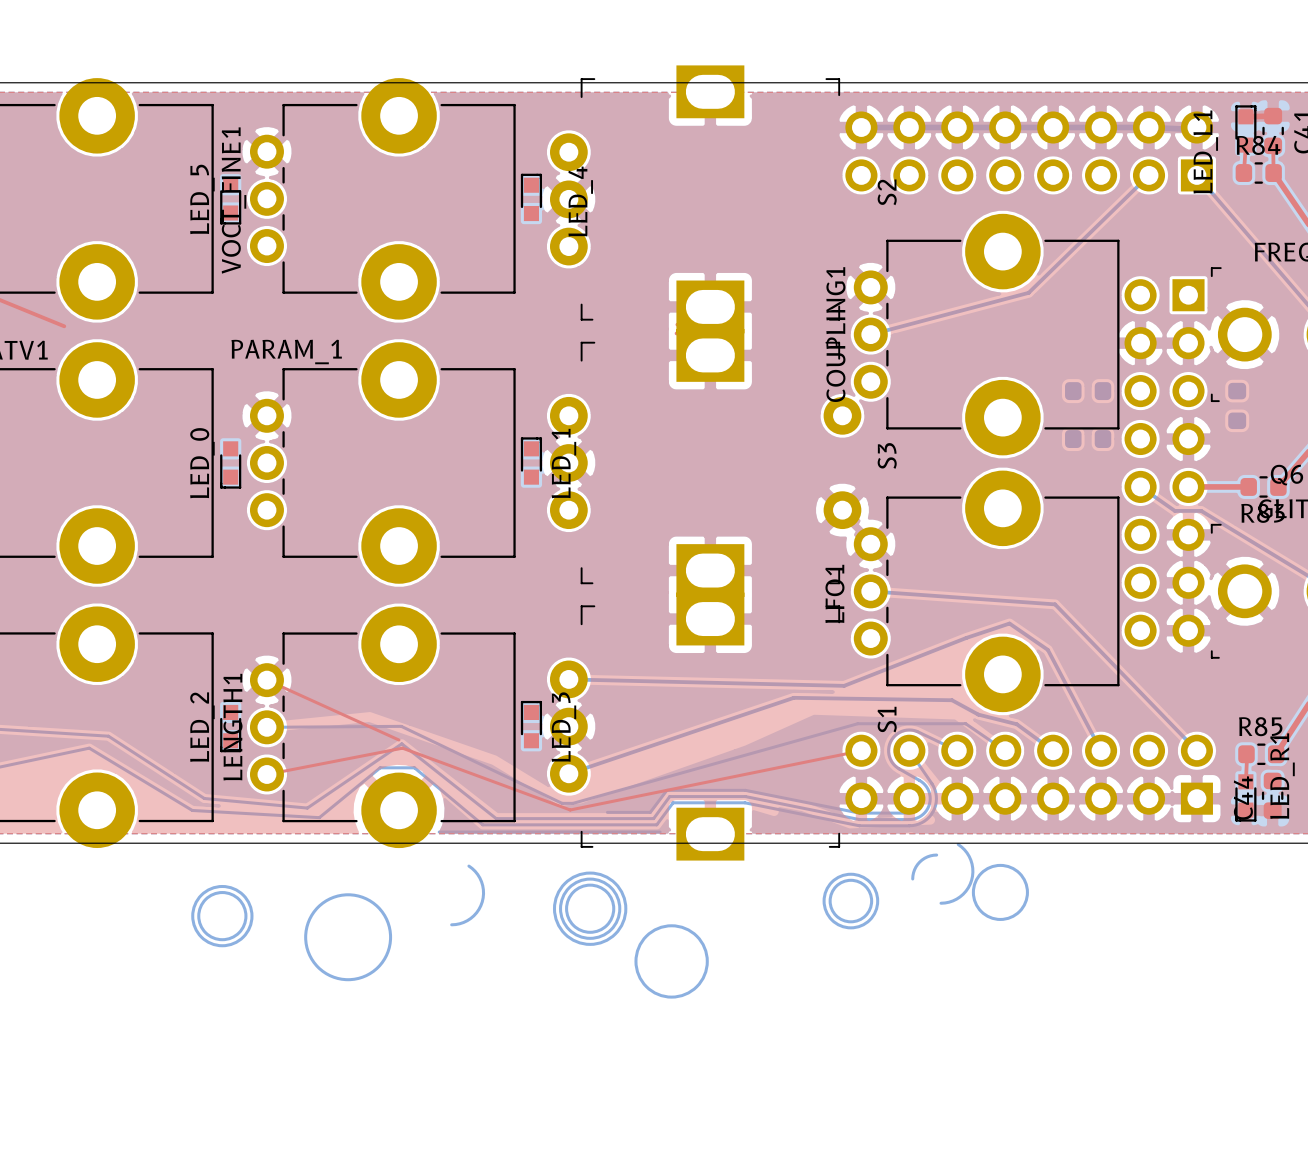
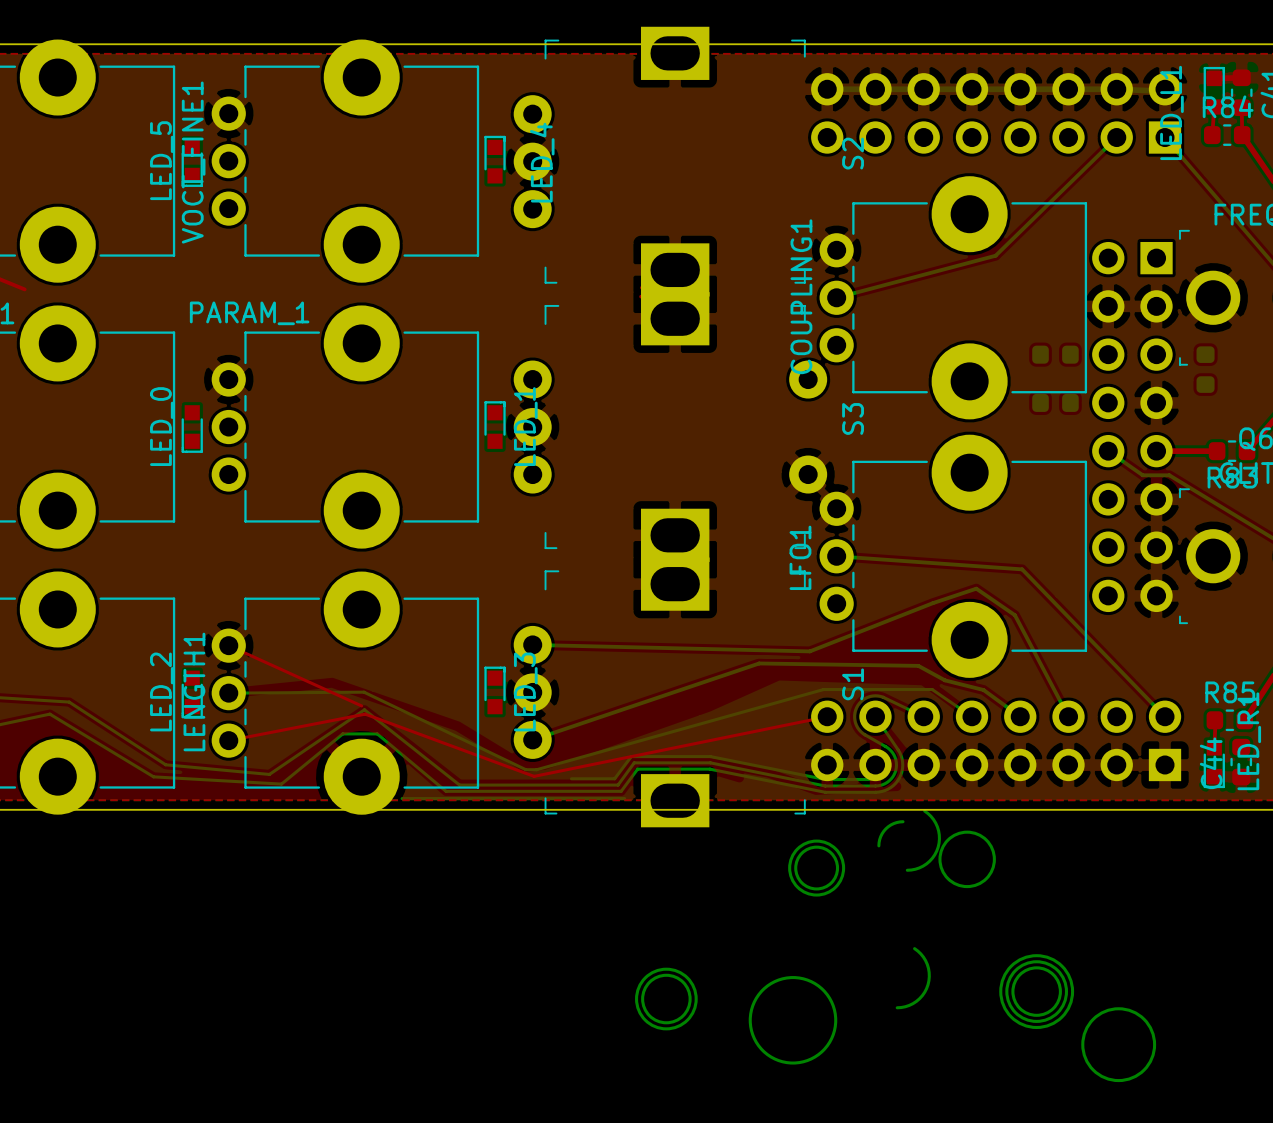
bottom track: (468, 866) (477, 874) (481, 881) (483, 893) (482, 901) (476, 912) (470, 918) (463, 922) (451, 924) -> none
drawing: [552, 871, 709, 999] -> none
drawing: [191, 884, 254, 948] -> none
drawing: [304, 893, 393, 982] -> none
drawing position: (590, 908) -> (666, 999)
drawing position: (590, 908) -> (666, 999)
bottom track: none -> (914, 948) (920, 953) (927, 964) (929, 972) (928, 984) (922, 995) (916, 1001) (909, 1005) (897, 1007)
drawing: none -> [999, 954, 1157, 1083]
drawing: none -> [748, 976, 838, 1065]

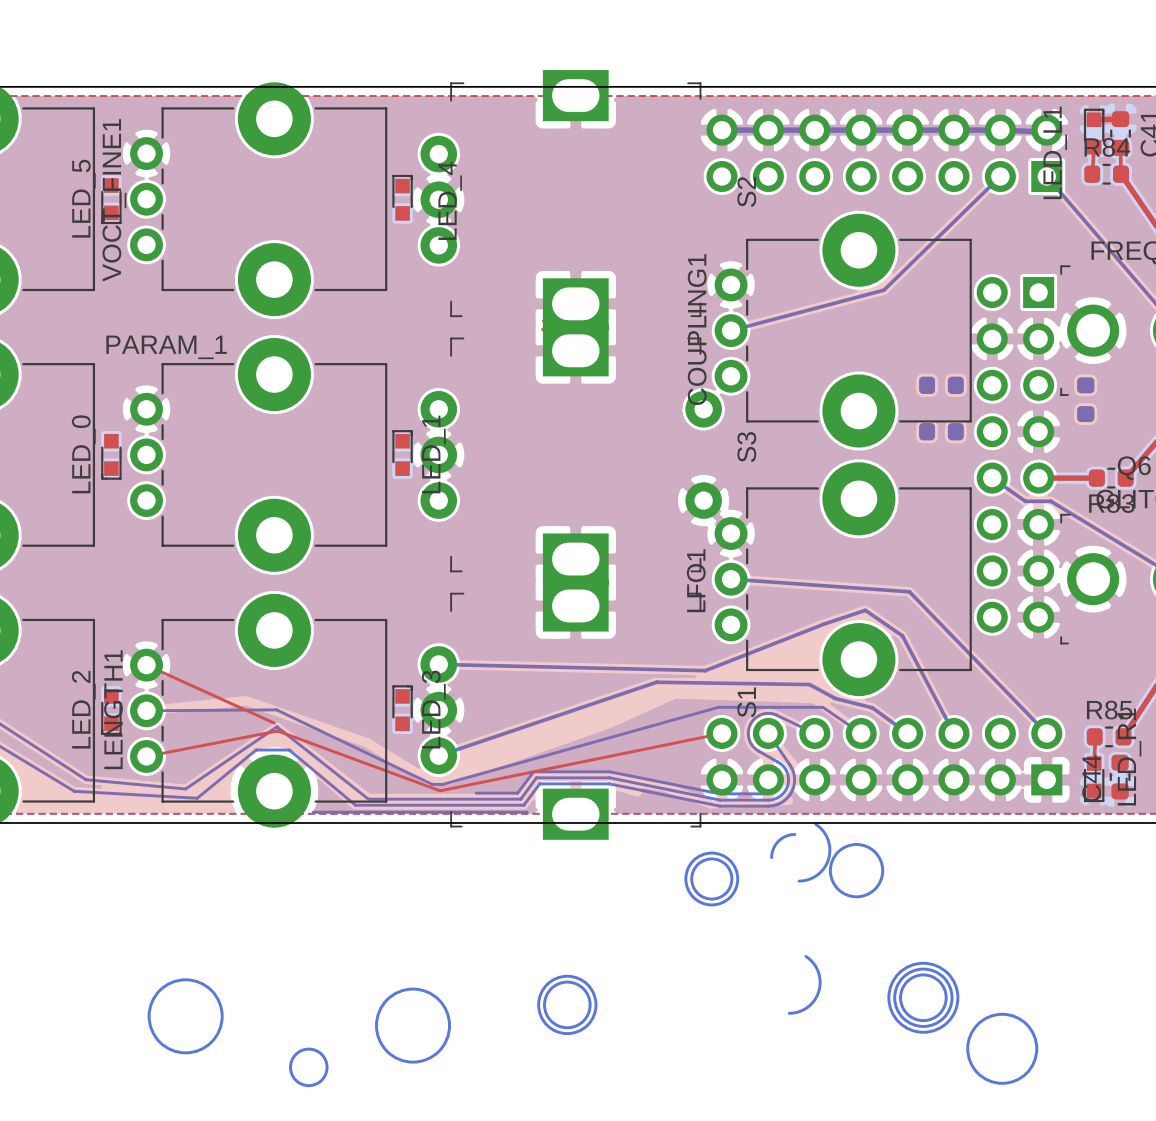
drawing: none -> [147, 978, 224, 1055]
drawing: [748, 976, 838, 1065] -> none
drawing: none -> [375, 987, 451, 1064]
drawing: none -> [289, 1047, 329, 1088]

